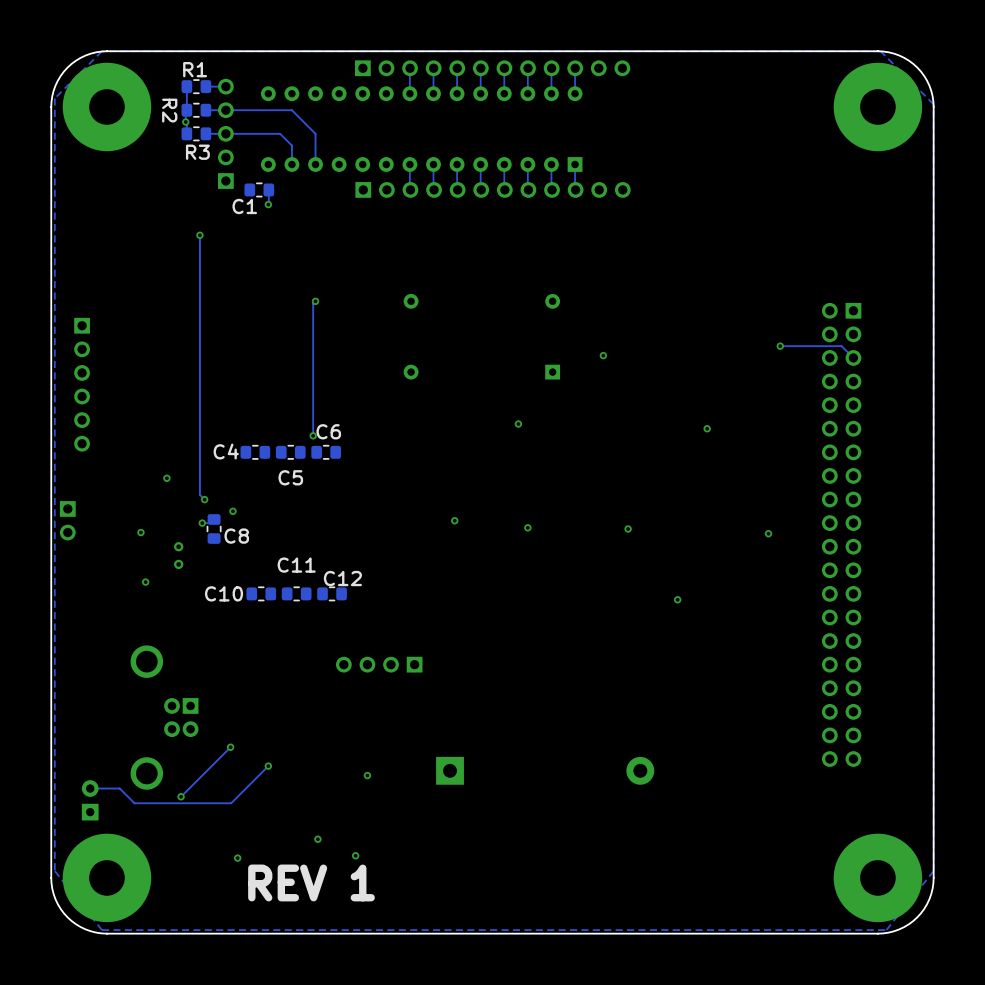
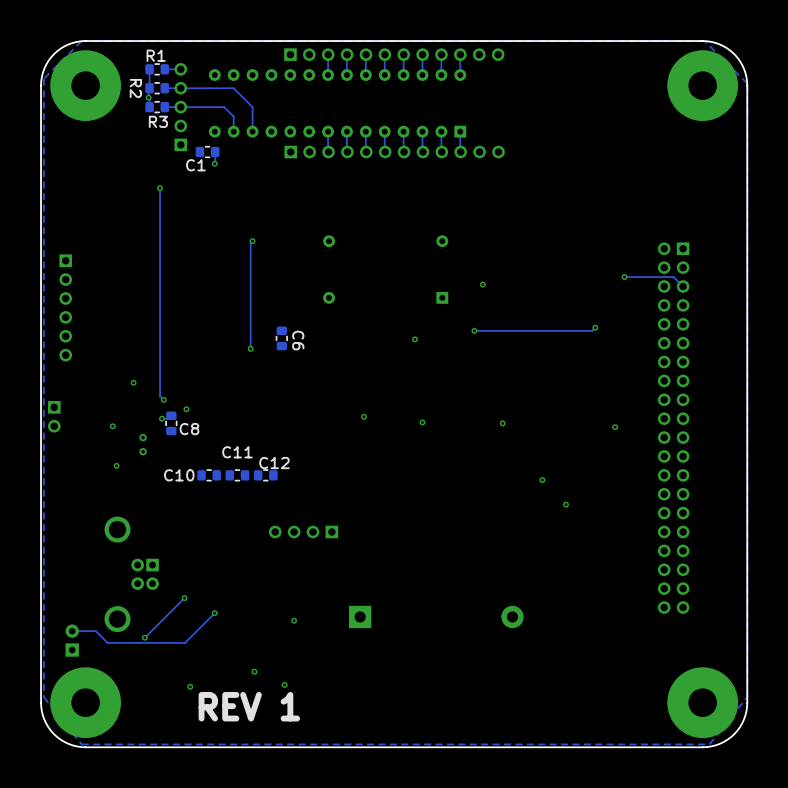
track: none -> (595, 327) (592, 330) (474, 330)
via: none -> (474, 330)
via position: (707, 428) -> (595, 327)
C4: (255, 452) -> none
C5: (290, 452) -> none
C6 rotation: 0° (326, 452) -> 90° clockwise (281, 338)
C6 position: (326, 452) -> (281, 338)
via: none -> (566, 504)

